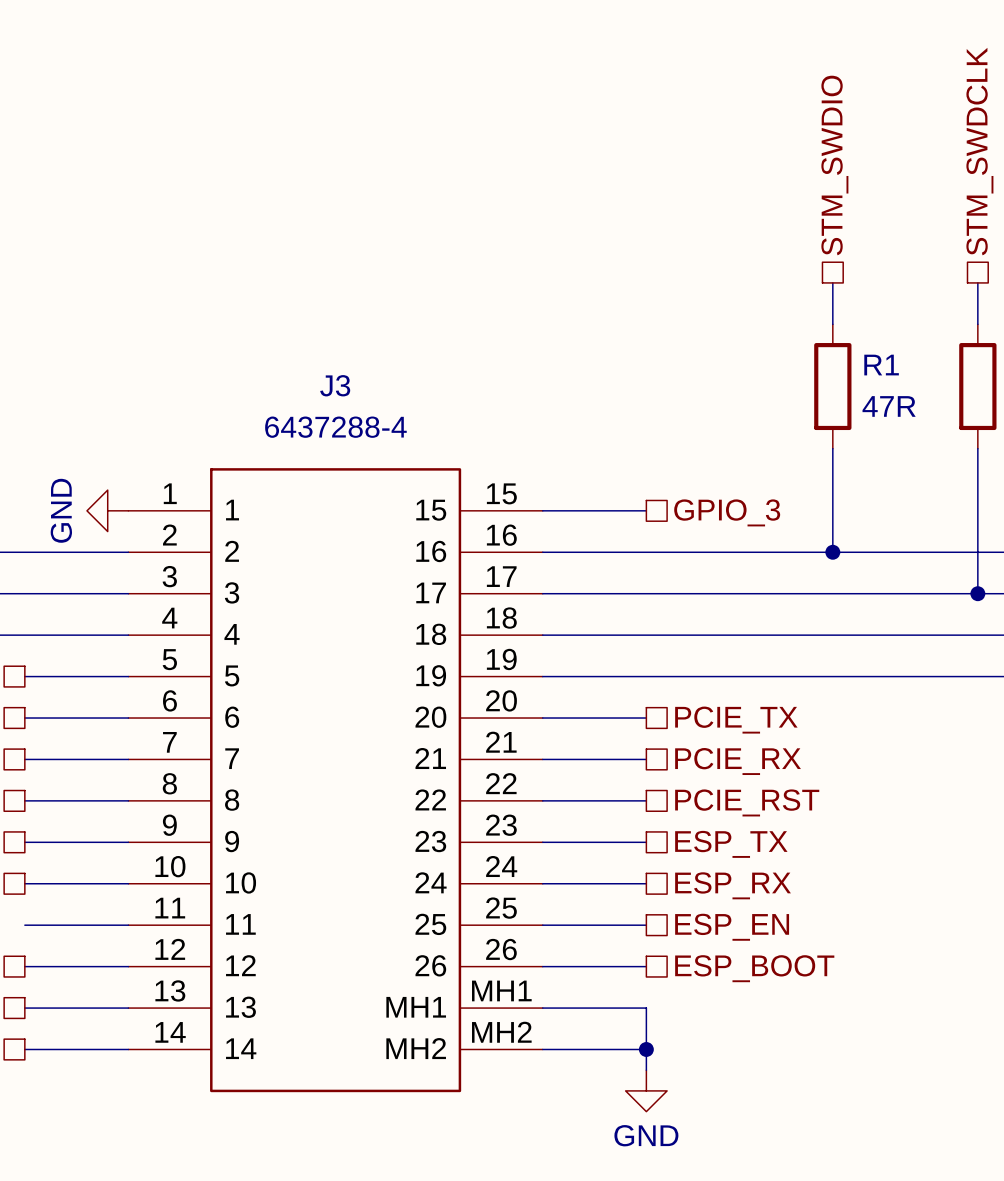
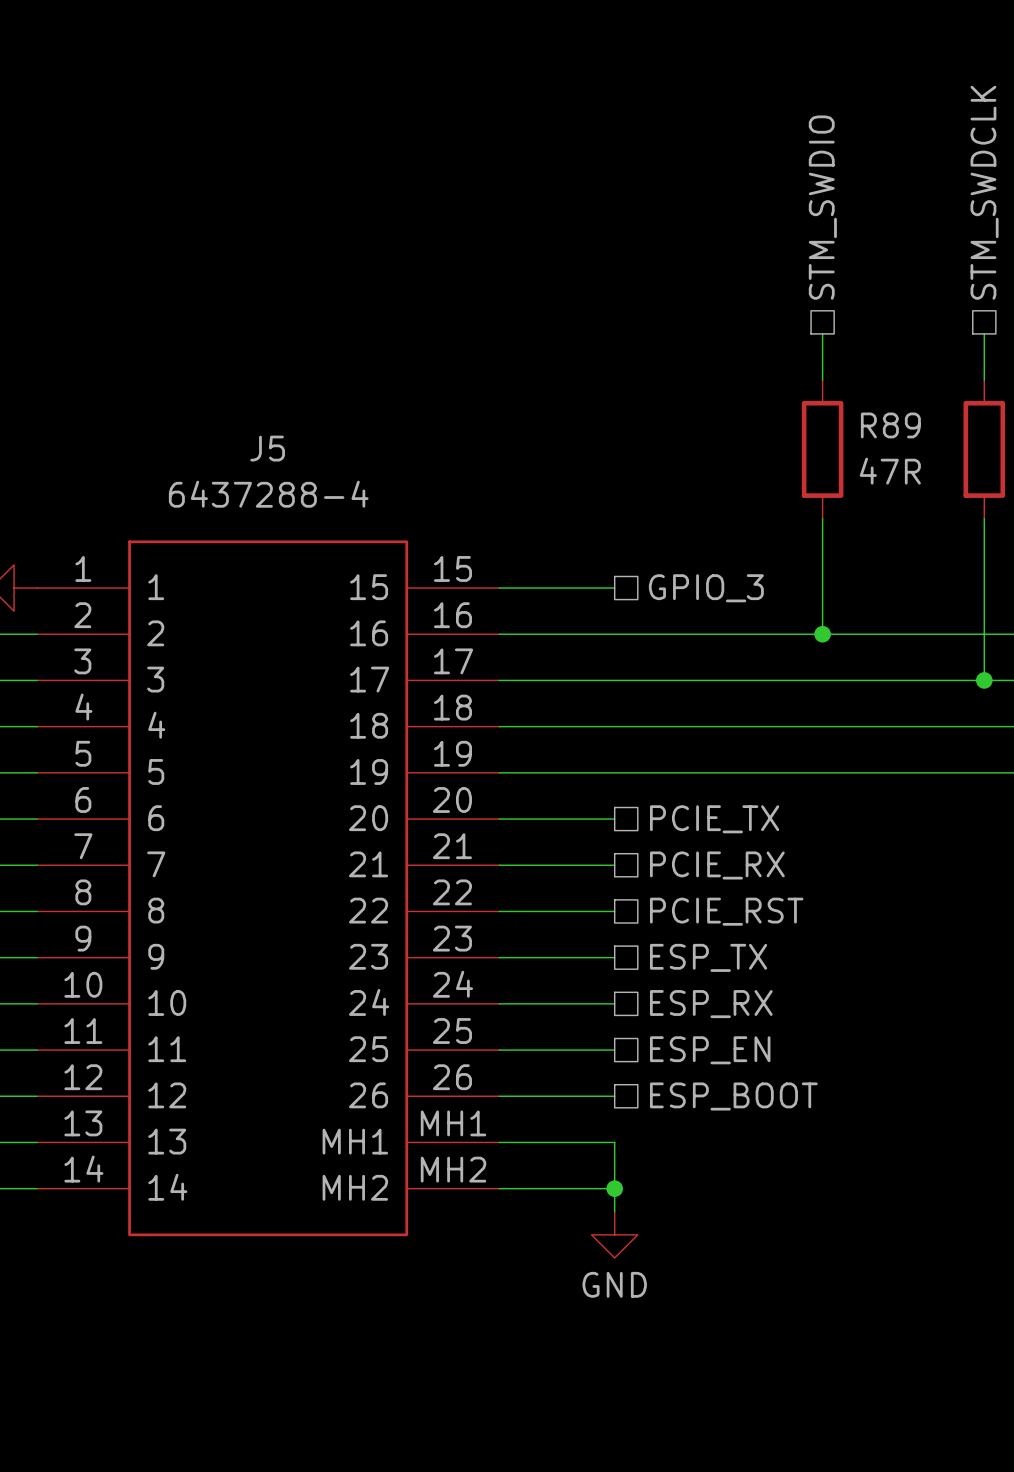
R1 name: R1 (881, 365) -> R89 (890, 425)
J3 name: J3 (335, 385) -> J5 (267, 448)

